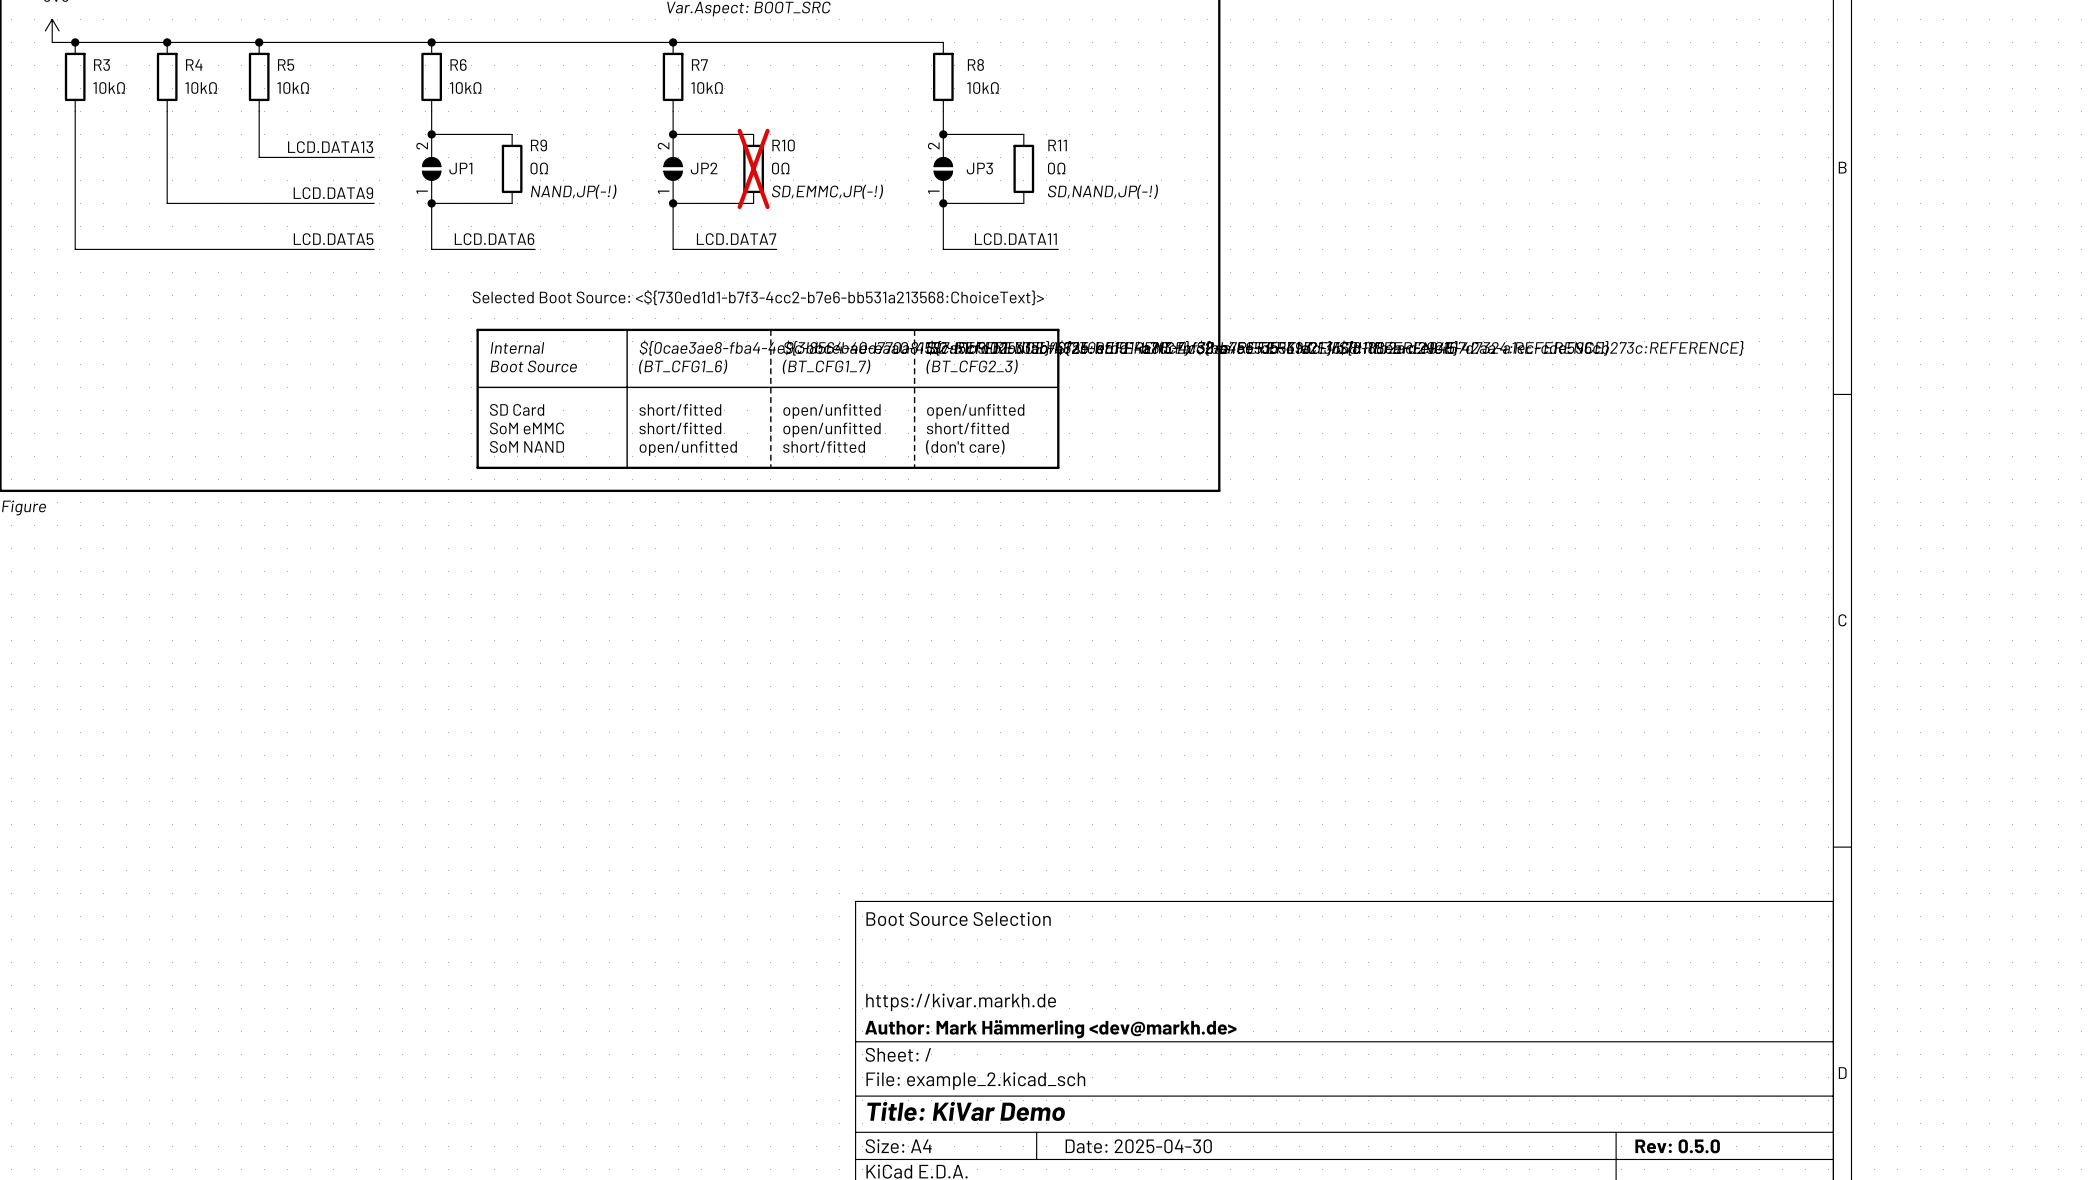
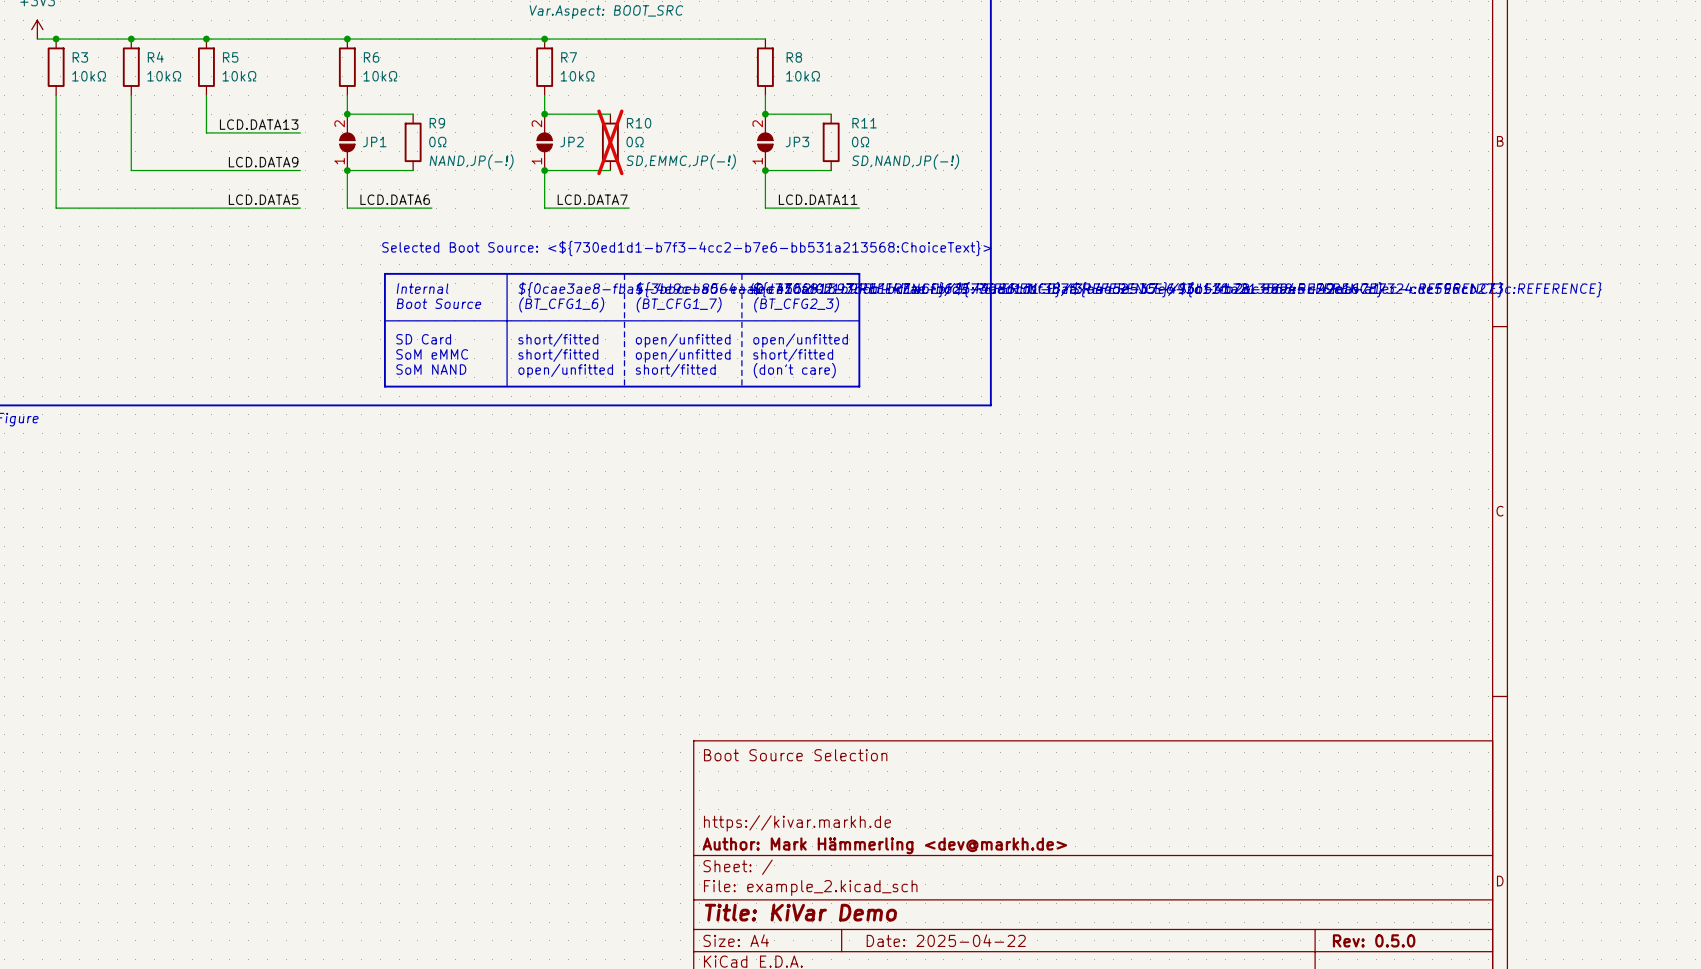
title block: Date: 2025-04-30 (1138, 1146) -> Date: 2025-04-22 (946, 940)

